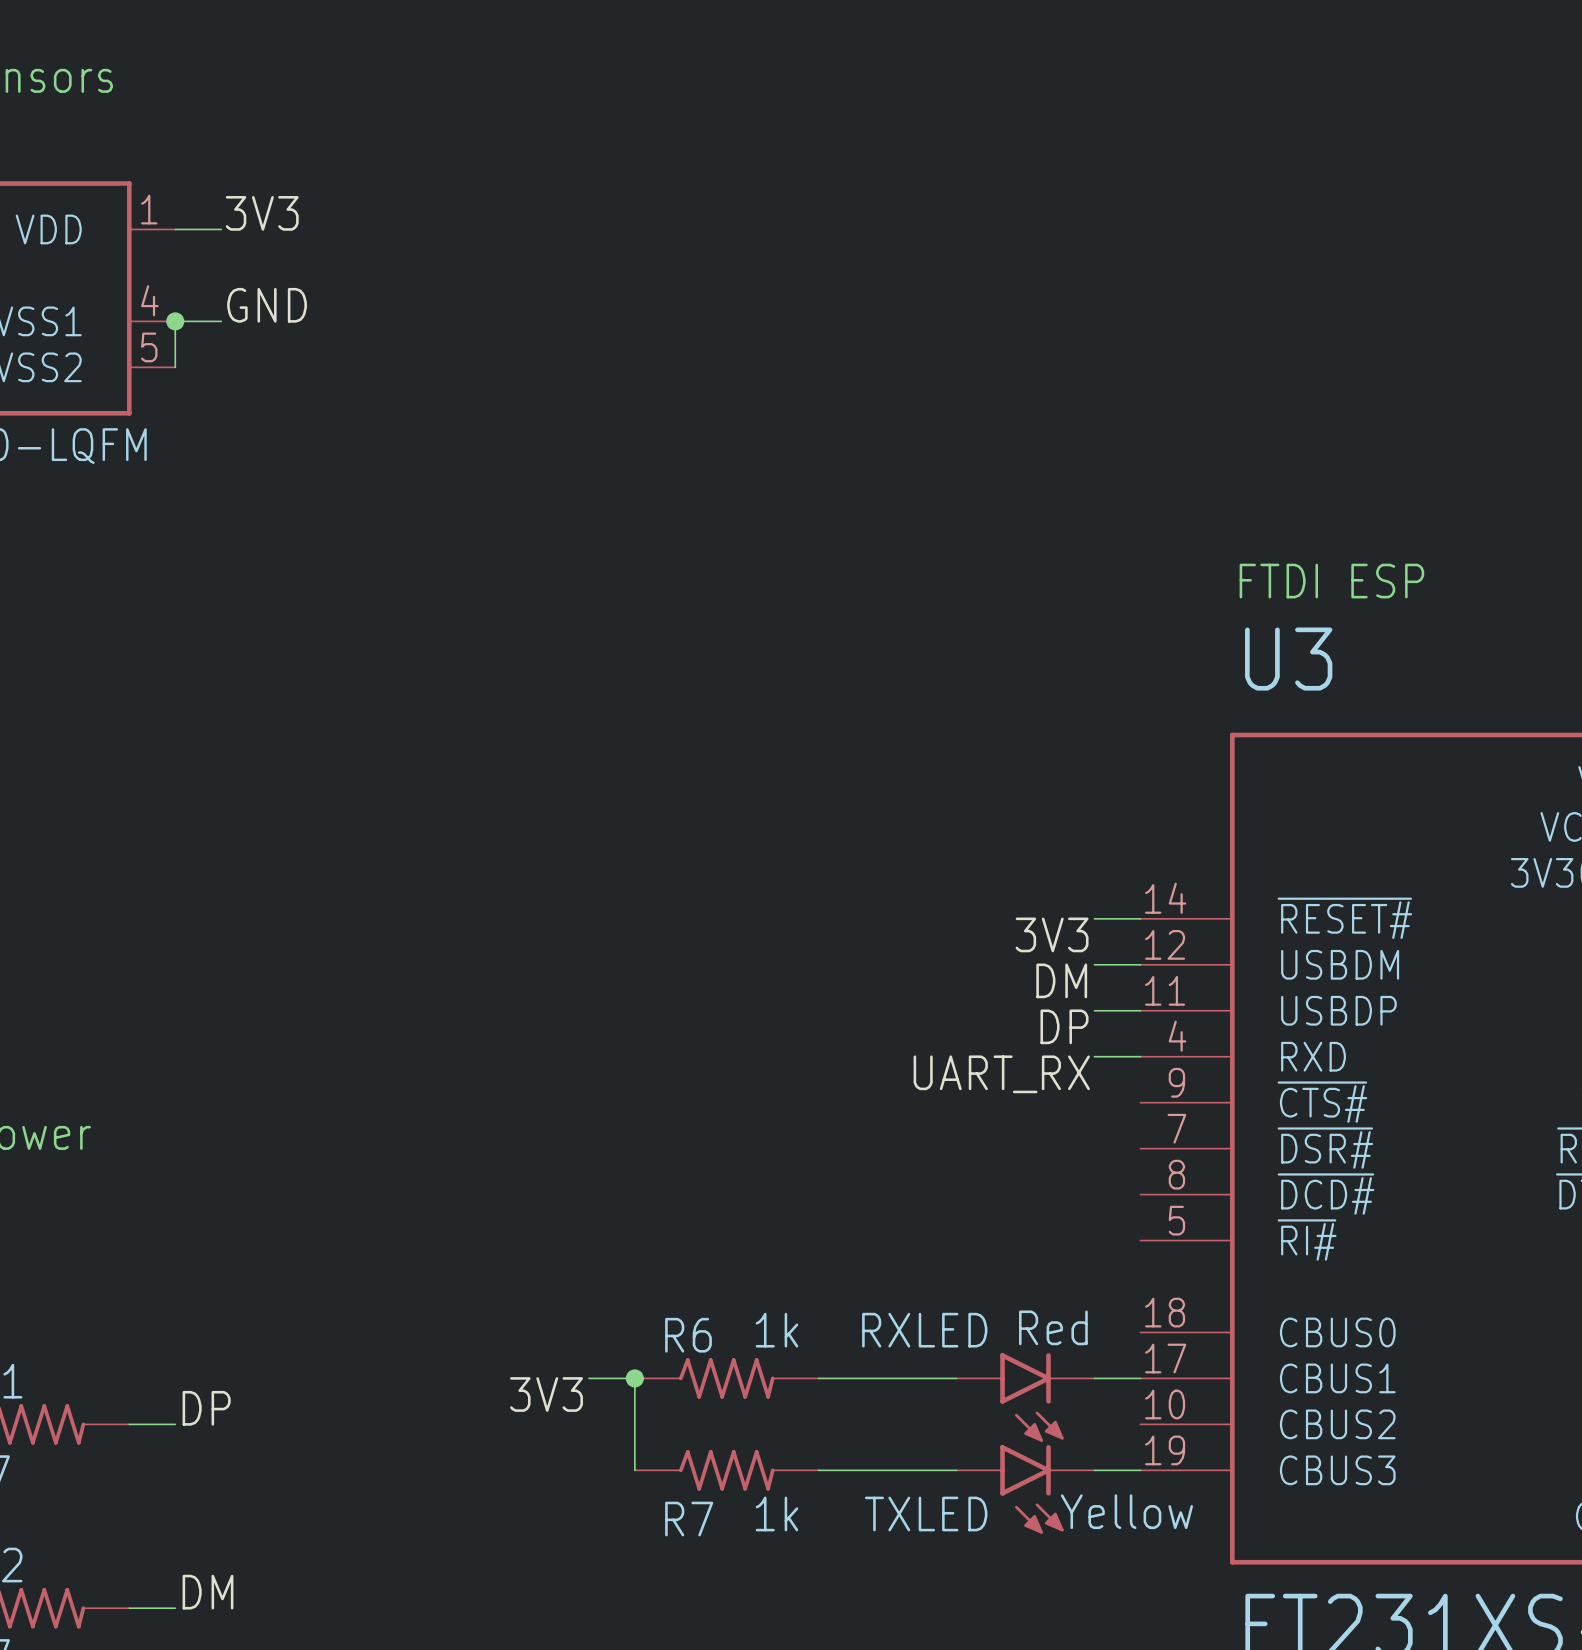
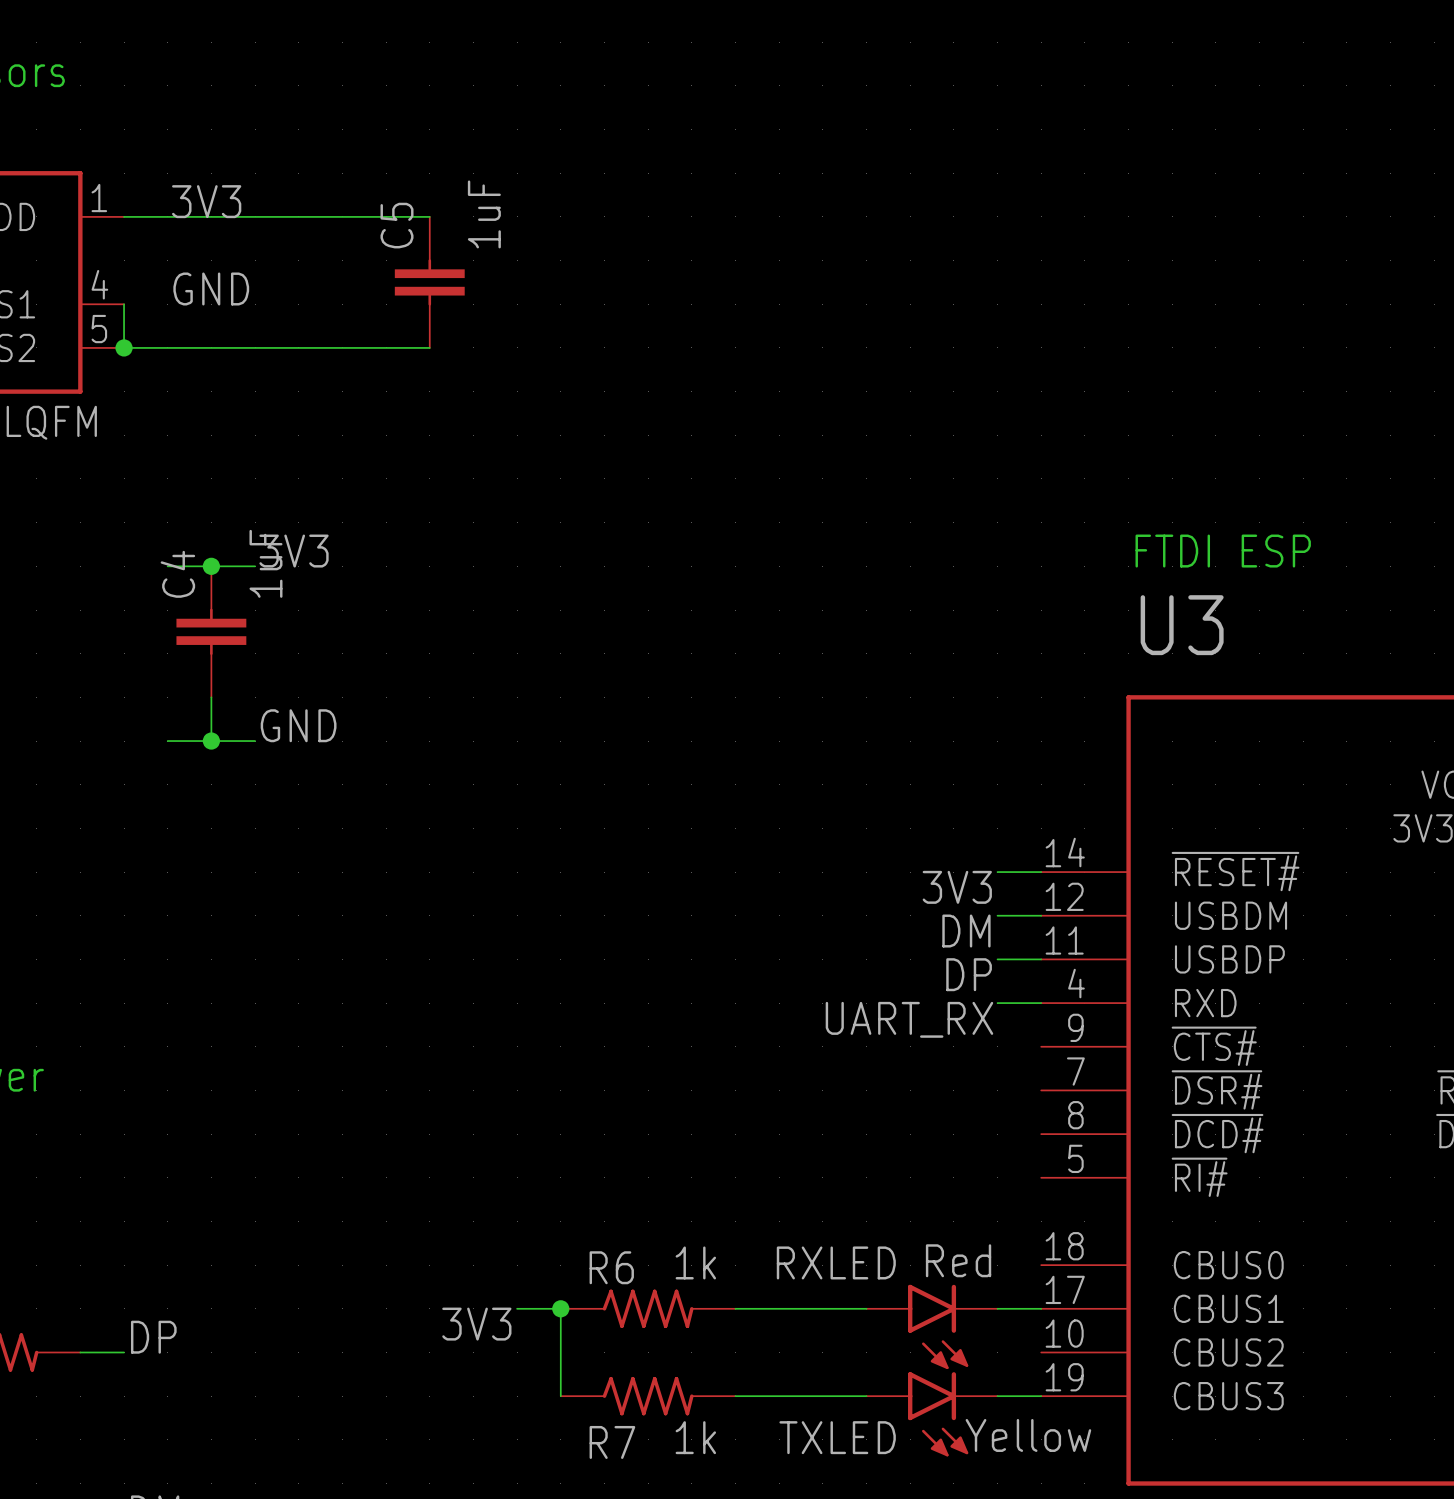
wire: none -> (167, 216) (429, 216)
C5: none -> 1uF (429, 282)
wire: (175, 321) (221, 321) -> none
junction position: (175, 321) -> (124, 347)
wire: none -> (124, 347) (429, 347)
label: none -> 3V3 (294, 551)
wire: none -> (167, 566) (255, 566)
junction: none -> (211, 566)
C4: none -> 1uF (211, 631)
wire: none -> (211, 697) (211, 741)
label: none -> GND (298, 725)
wire: none -> (167, 741) (255, 741)
junction: none -> (211, 741)

